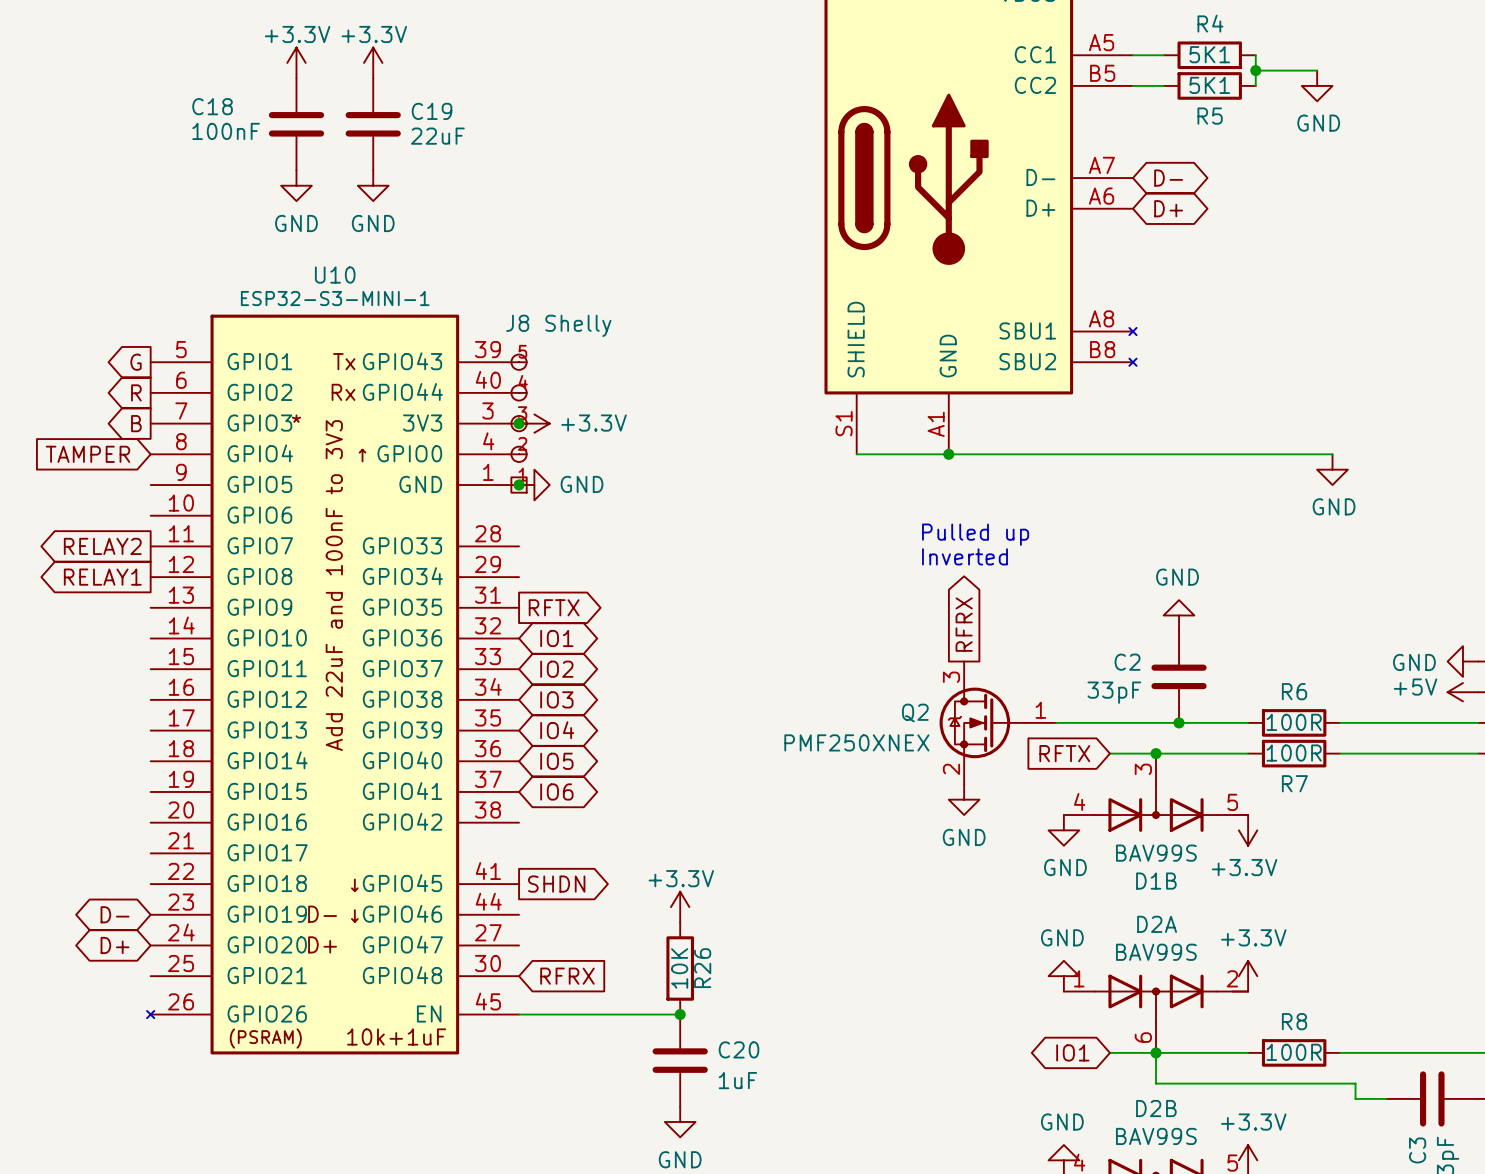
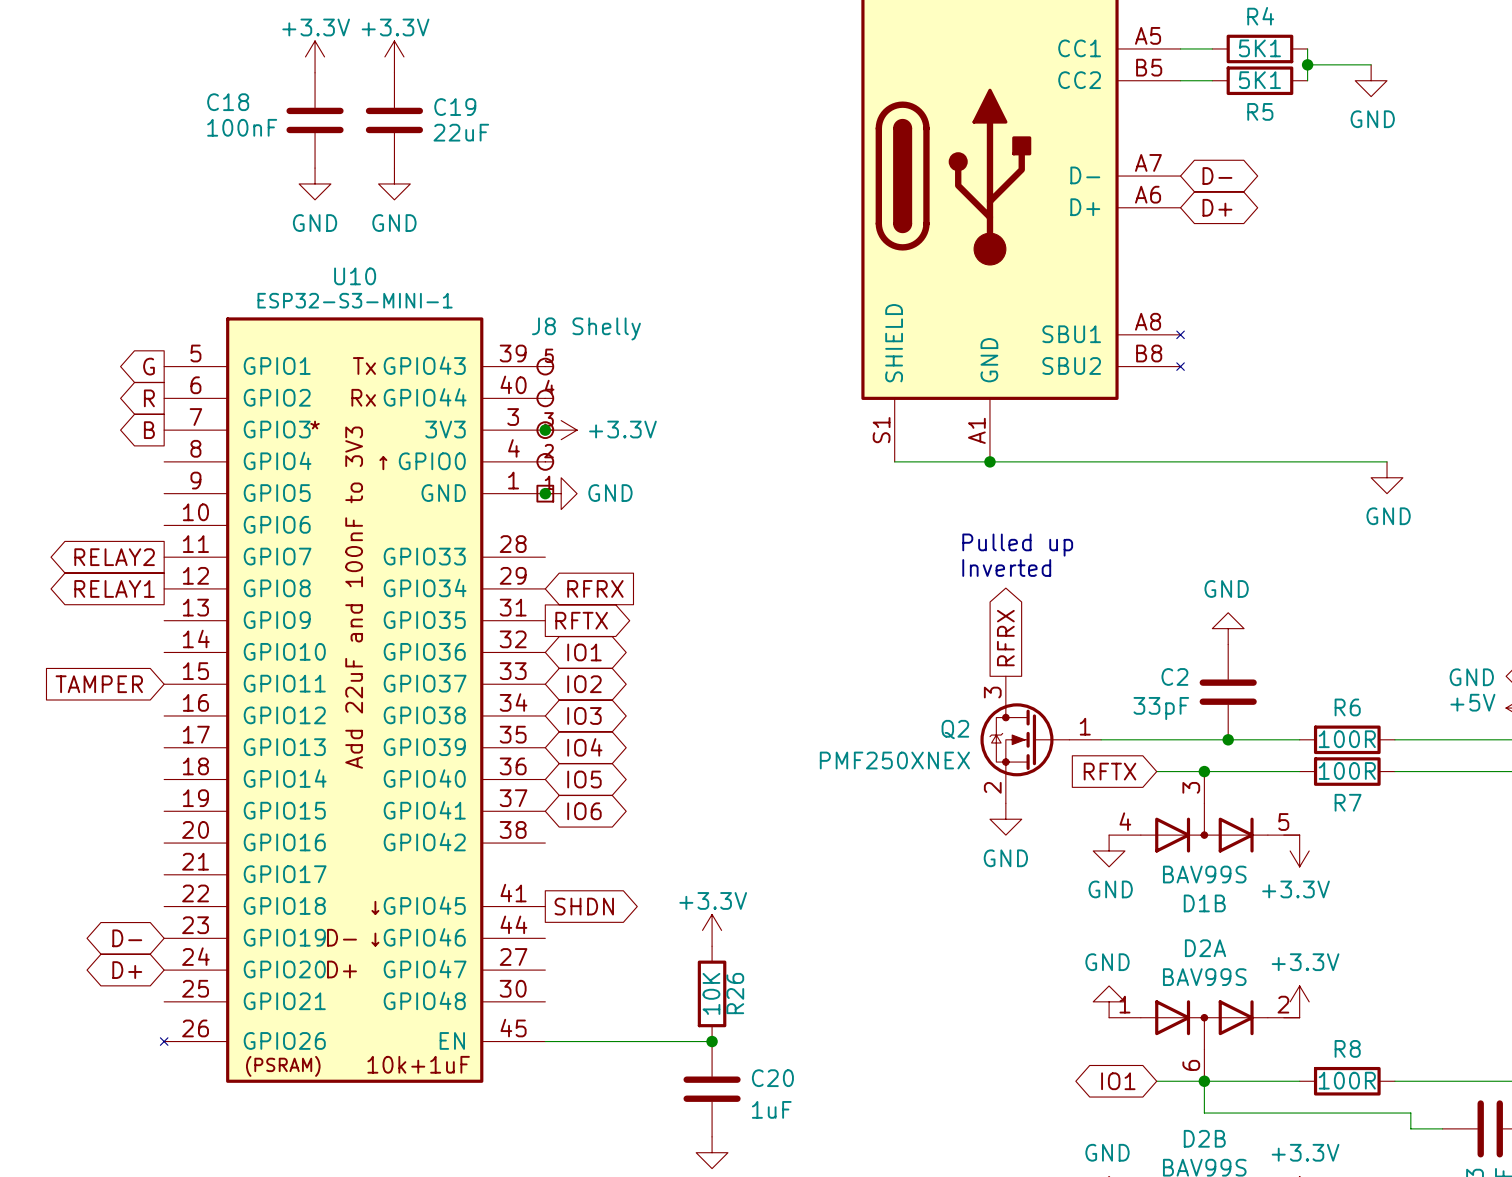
global label position: TAMPER (87, 454) -> TAMPER (99, 684)
global label: none -> RFRX (595, 588)
global label: RFRX (567, 976) -> none

